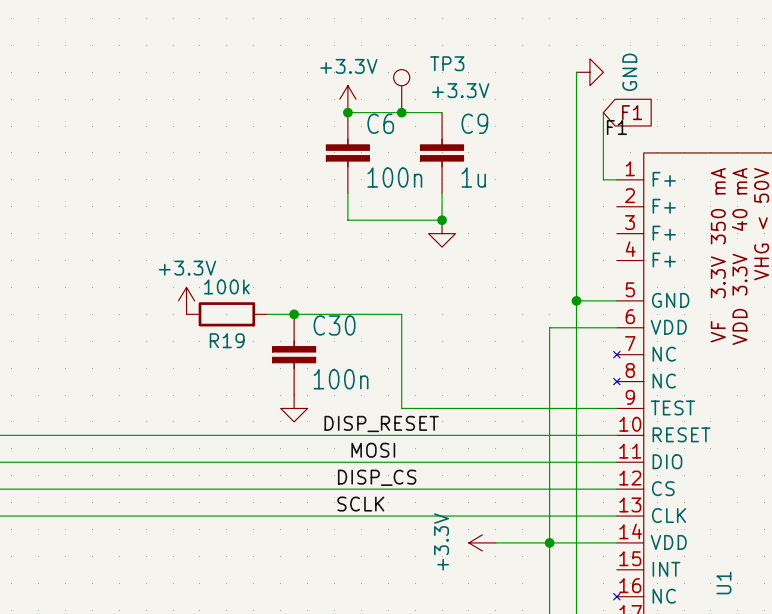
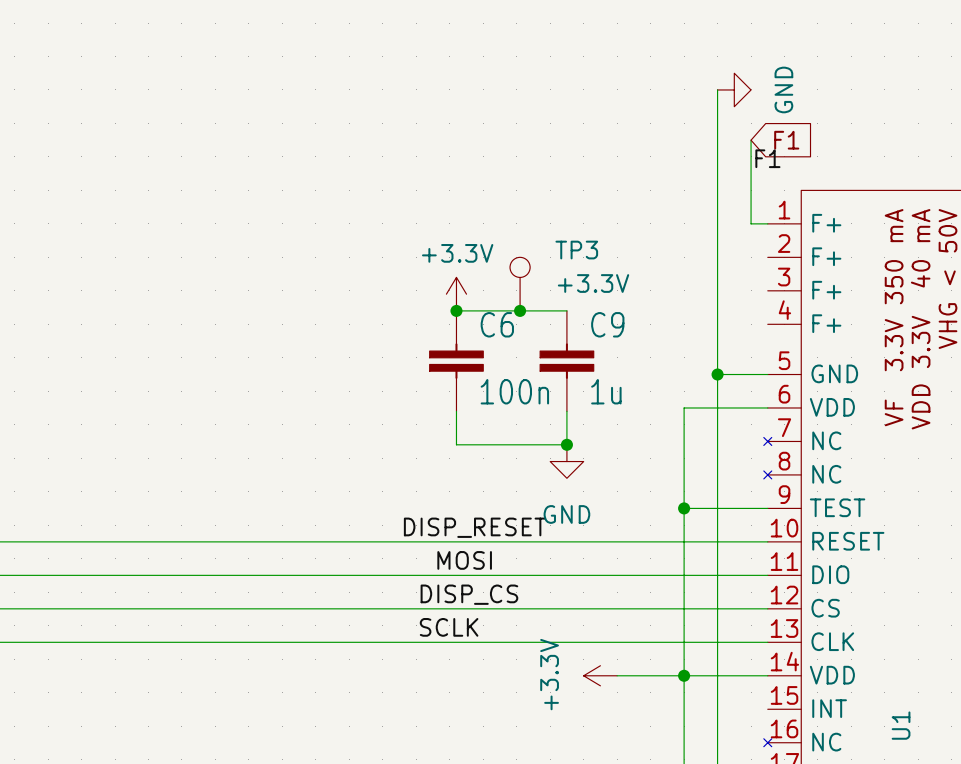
TP3 position: (401, 91) -> (520, 284)
power symbol: +3.3V (347, 99) -> none
wire: (347, 112) (442, 112) -> none
junction: (347, 112) -> none
junction: (401, 112) -> none
C6 position: (347, 152) -> (456, 361)
C9 position: (442, 152) -> (566, 361)
wire: (347, 193) (347, 220) (442, 220) (442, 193) -> none
junction position: (442, 220) -> (520, 310)
power symbol: (442, 233) -> none
power symbol: none -> +3.3V (456, 294)
wire: none -> (456, 310) (566, 310)
junction: none -> (456, 310)
power symbol: +3.3V (186, 300) -> none
R19: 100k (226, 314) -> none
wire: (267, 314) (401, 314) (401, 408) (549, 408) -> none
junction: (294, 314) -> none
wire: none -> (456, 411) (456, 444) (566, 444) (566, 411)
C30: 100n (294, 354) -> none
junction: none -> (566, 444)
power symbol: none -> GND (566, 461)
power symbol: (294, 408) -> none
junction: none -> (684, 508)

